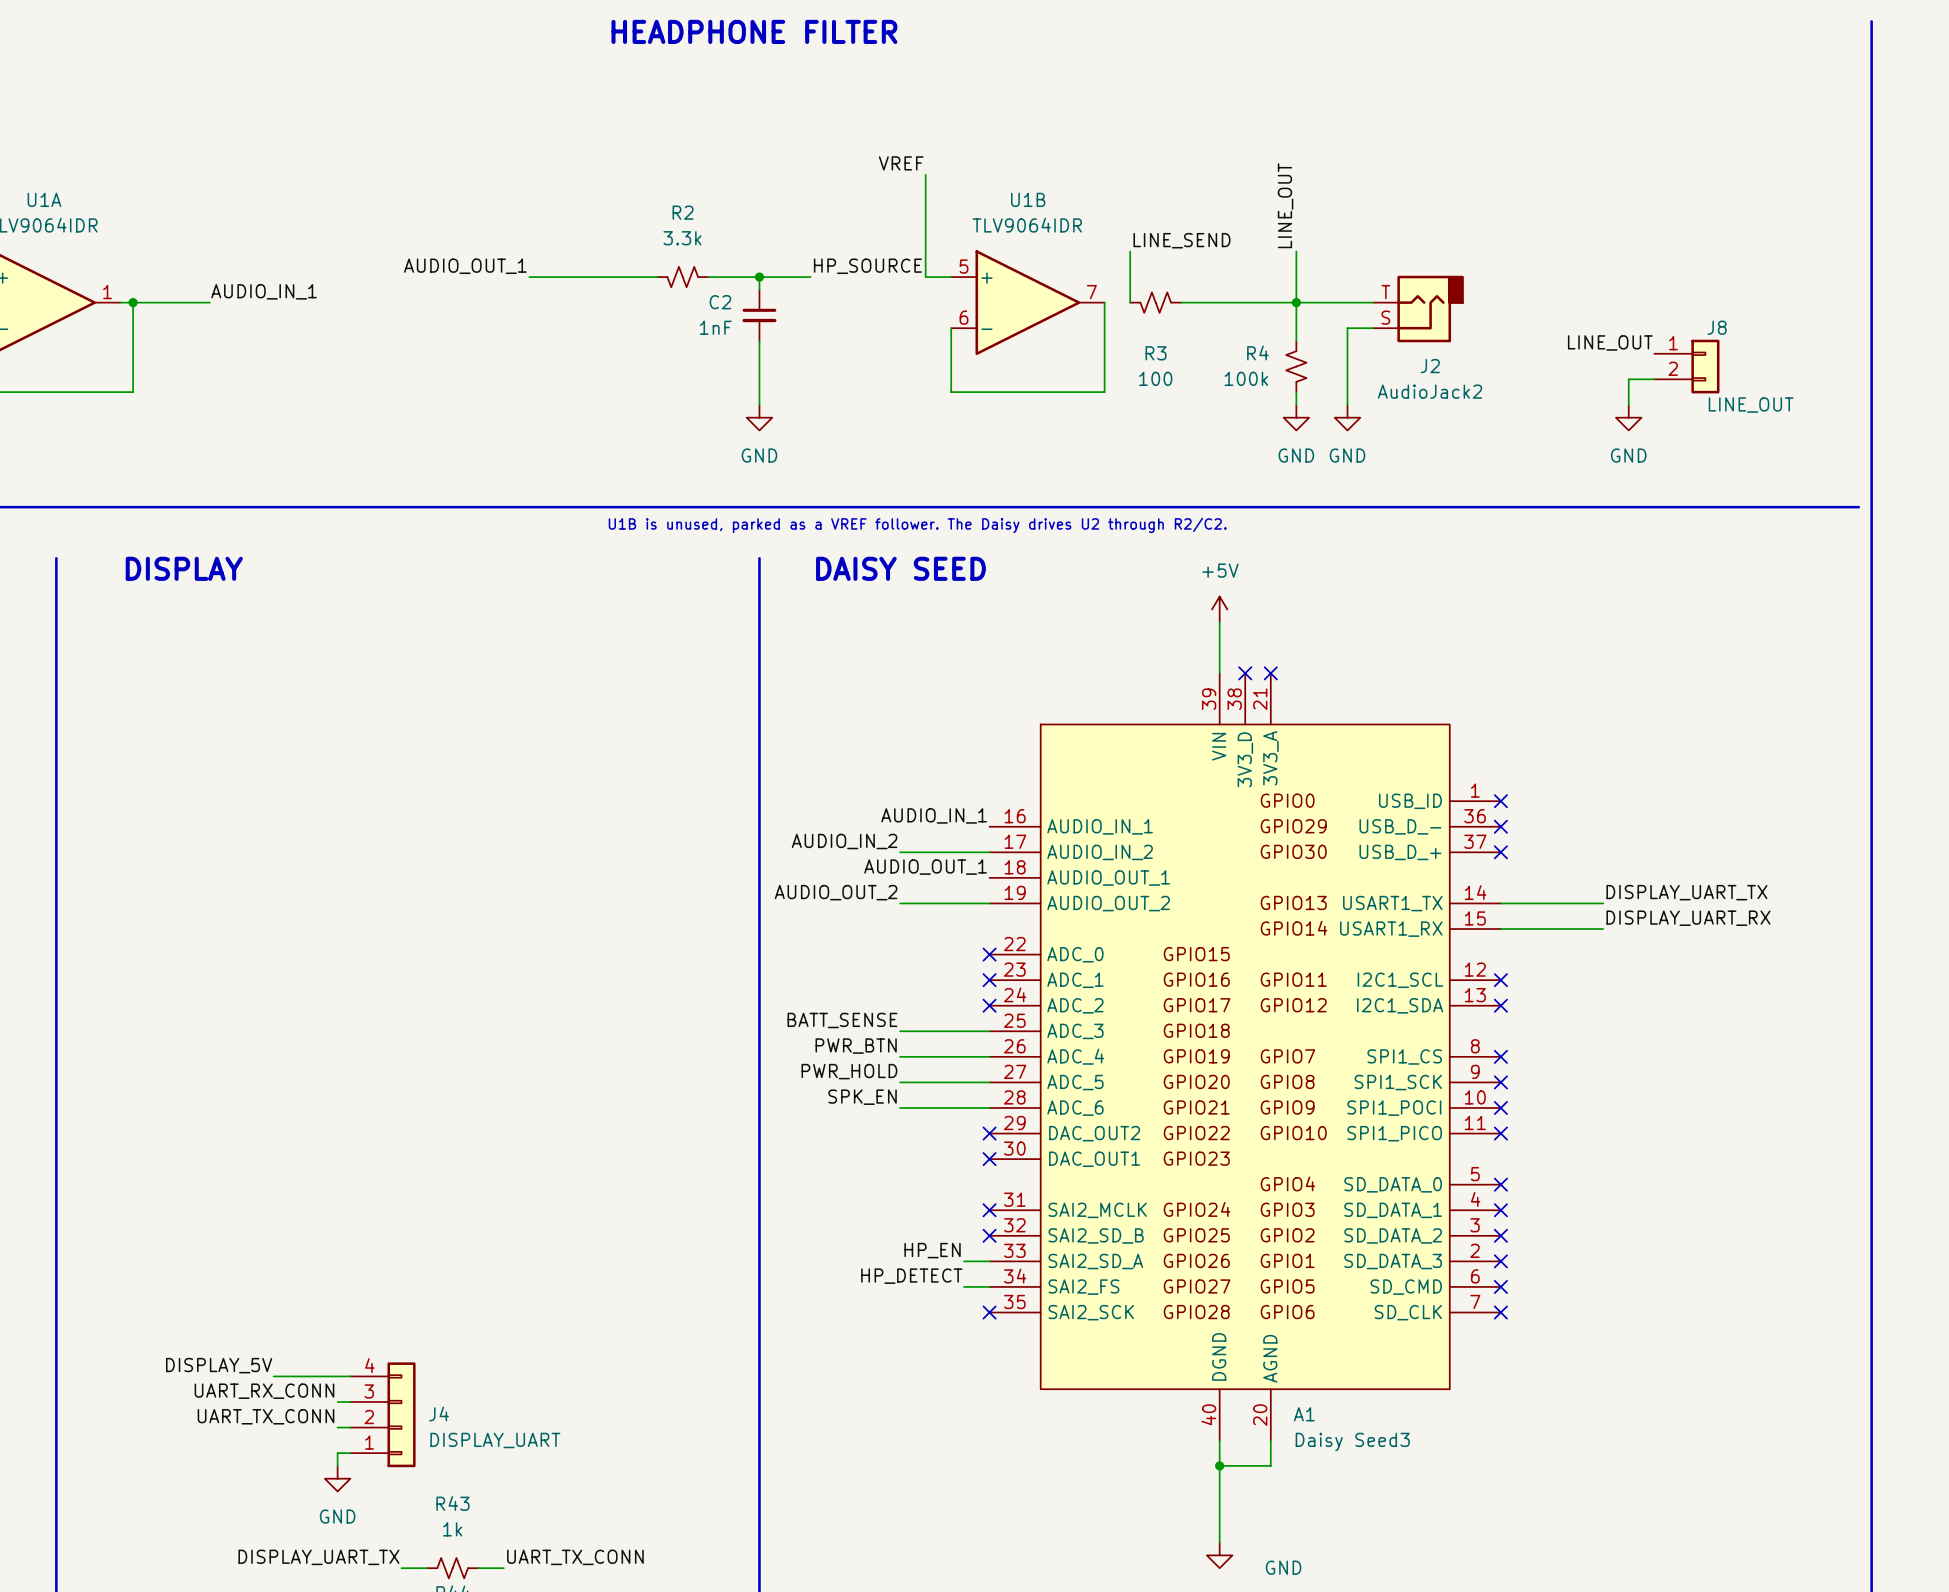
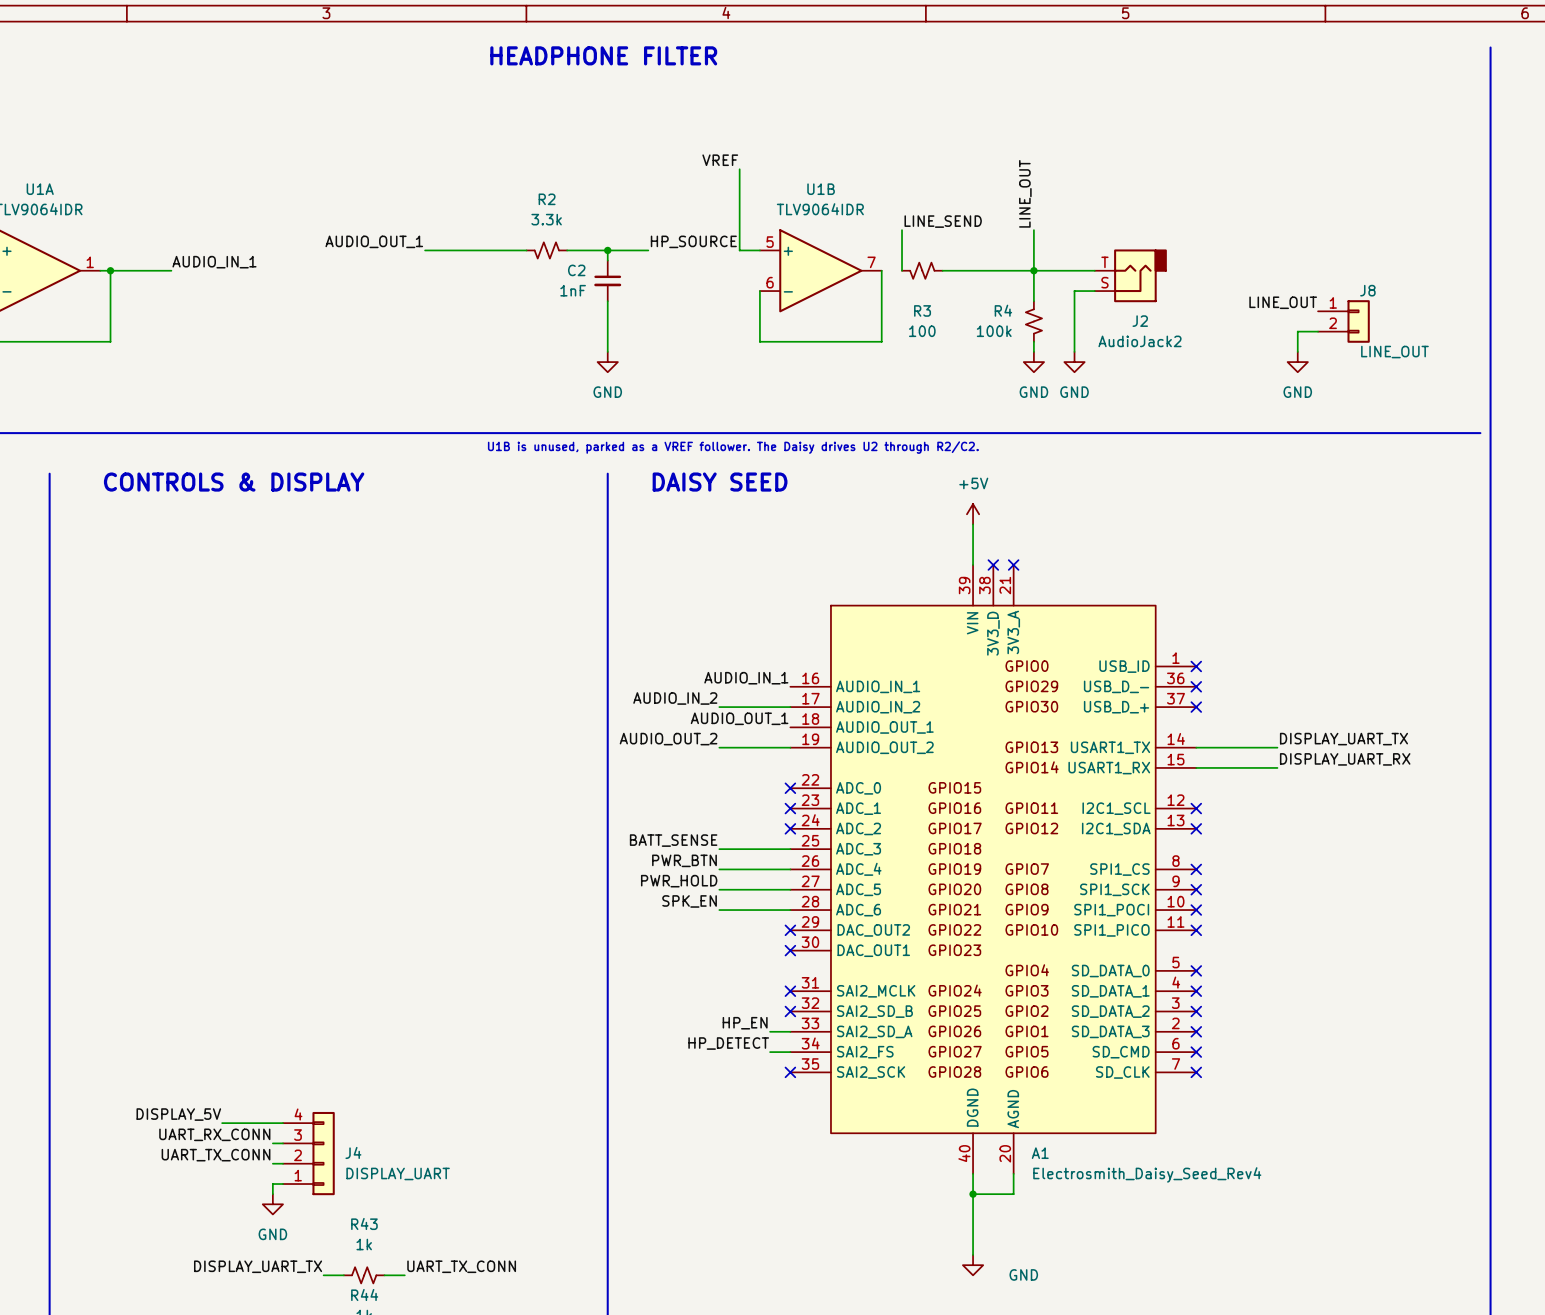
text: DISPLAY (184, 568) -> CONTROLS & DISPLAY (234, 482)
A1 value: Daisy Seed3 (1352, 1442) -> Electrosmith_Daisy_Seed_Rev4 (1147, 1174)

